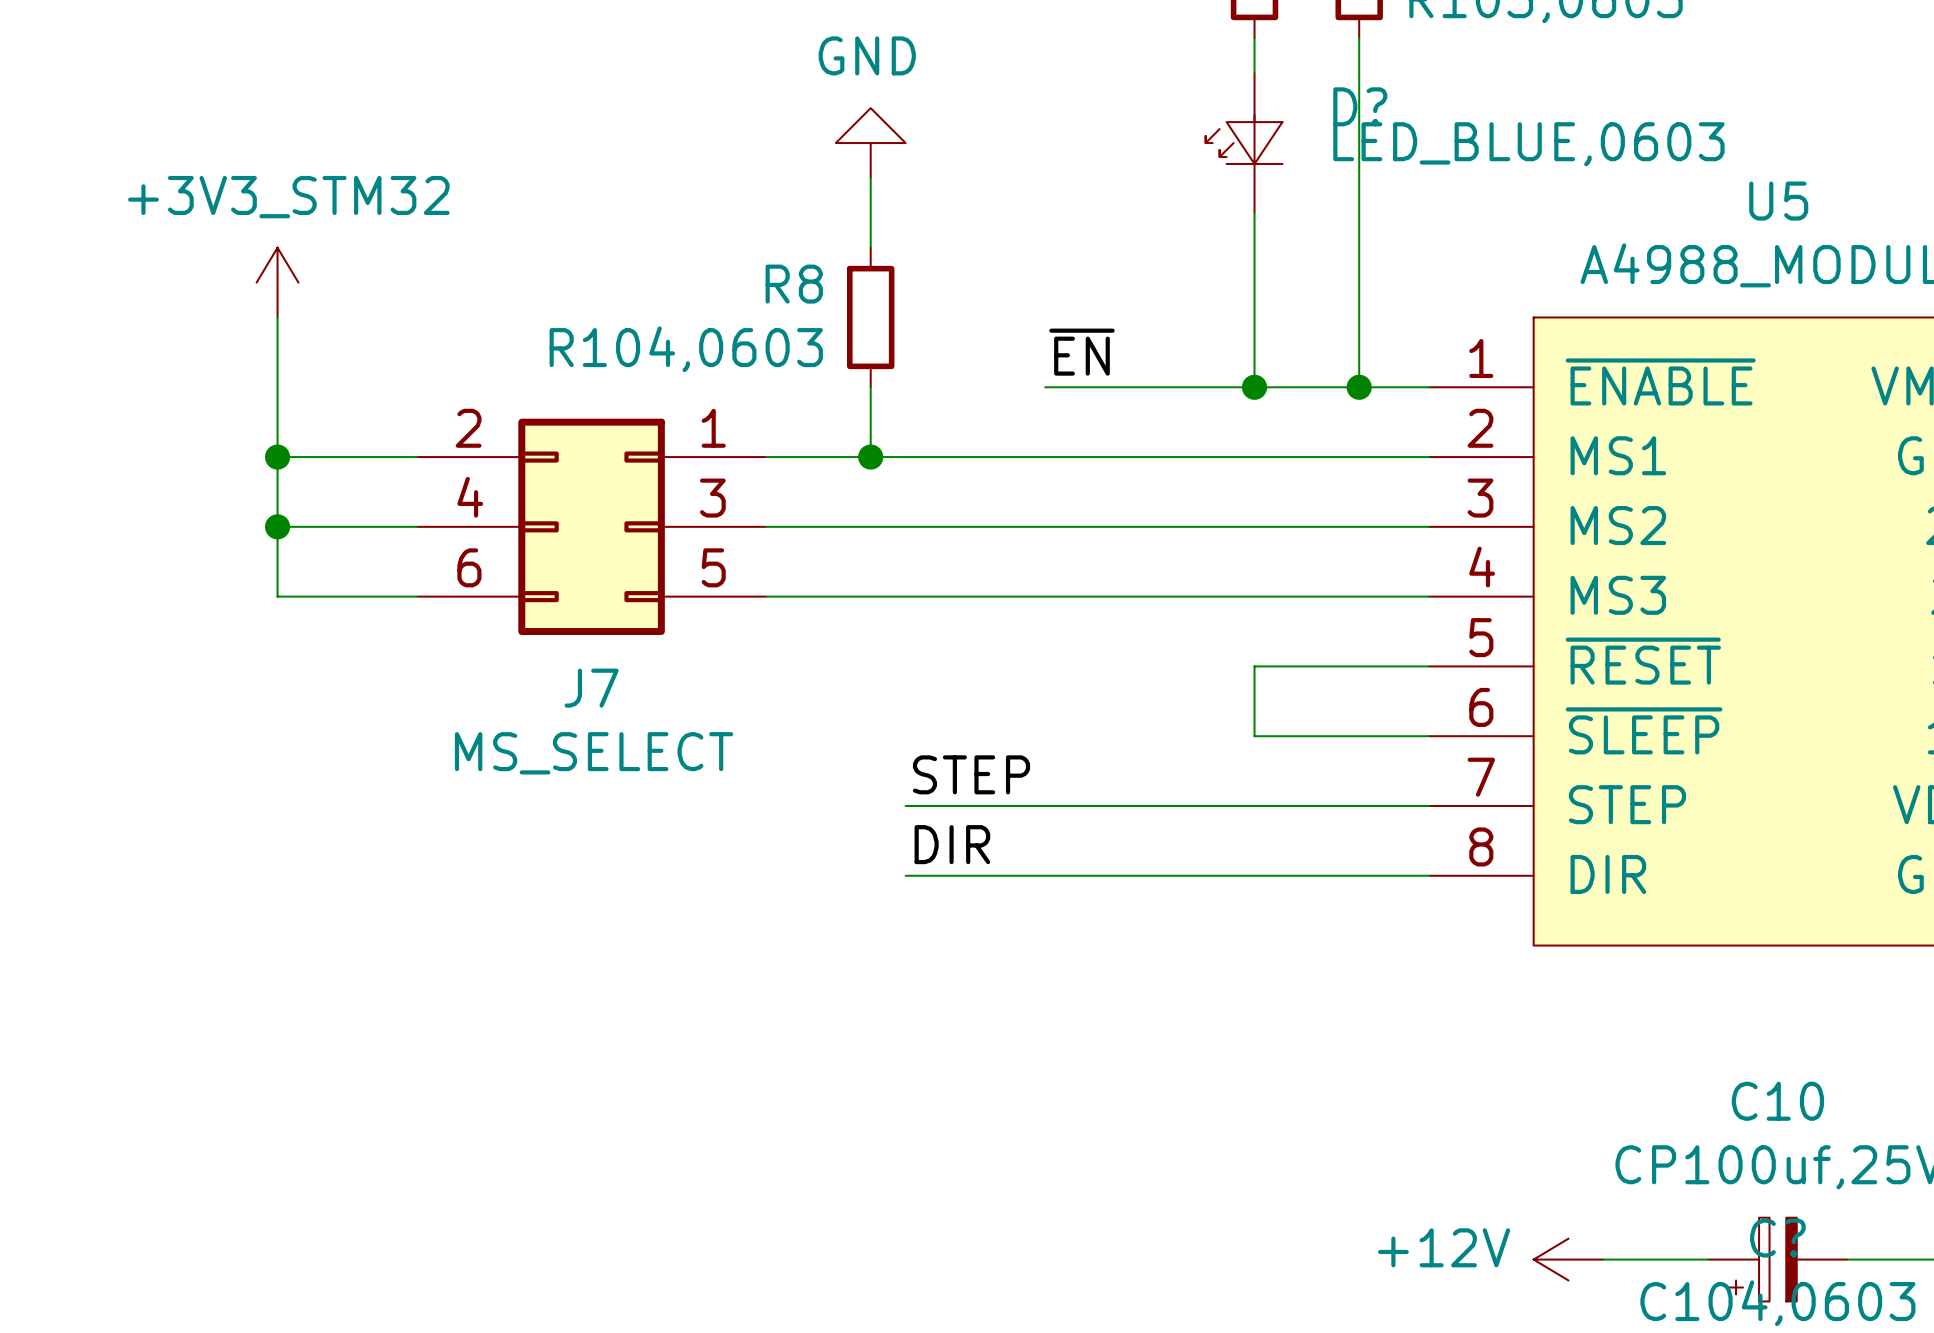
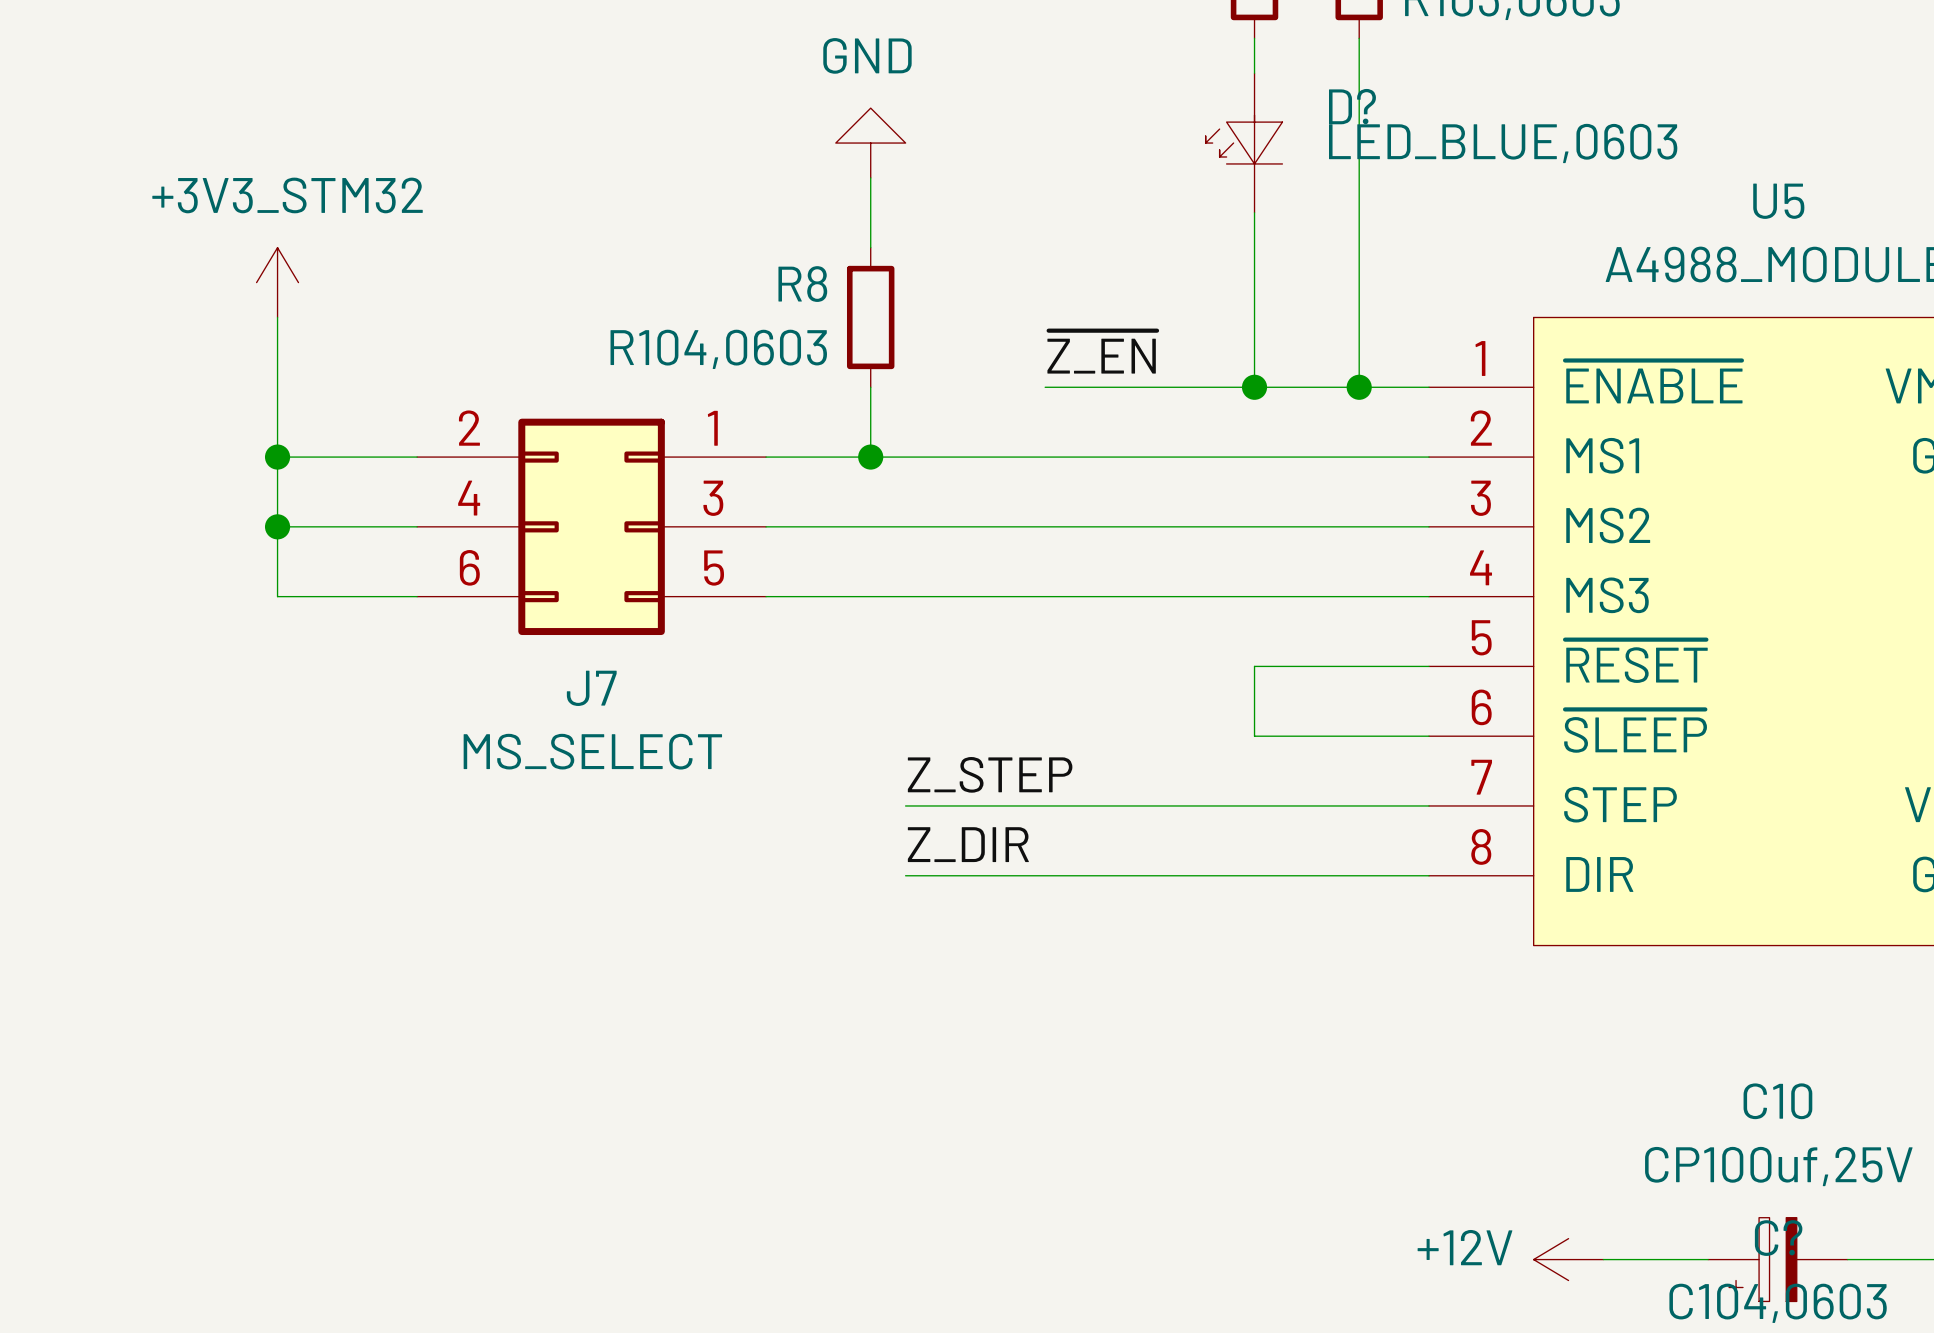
label: ~{EN} (1081, 352) -> ~{Z_EN} (1102, 352)
label: STEP (971, 774) -> Z_STEP (990, 774)
label: DIR (952, 844) -> Z_DIR (968, 844)

